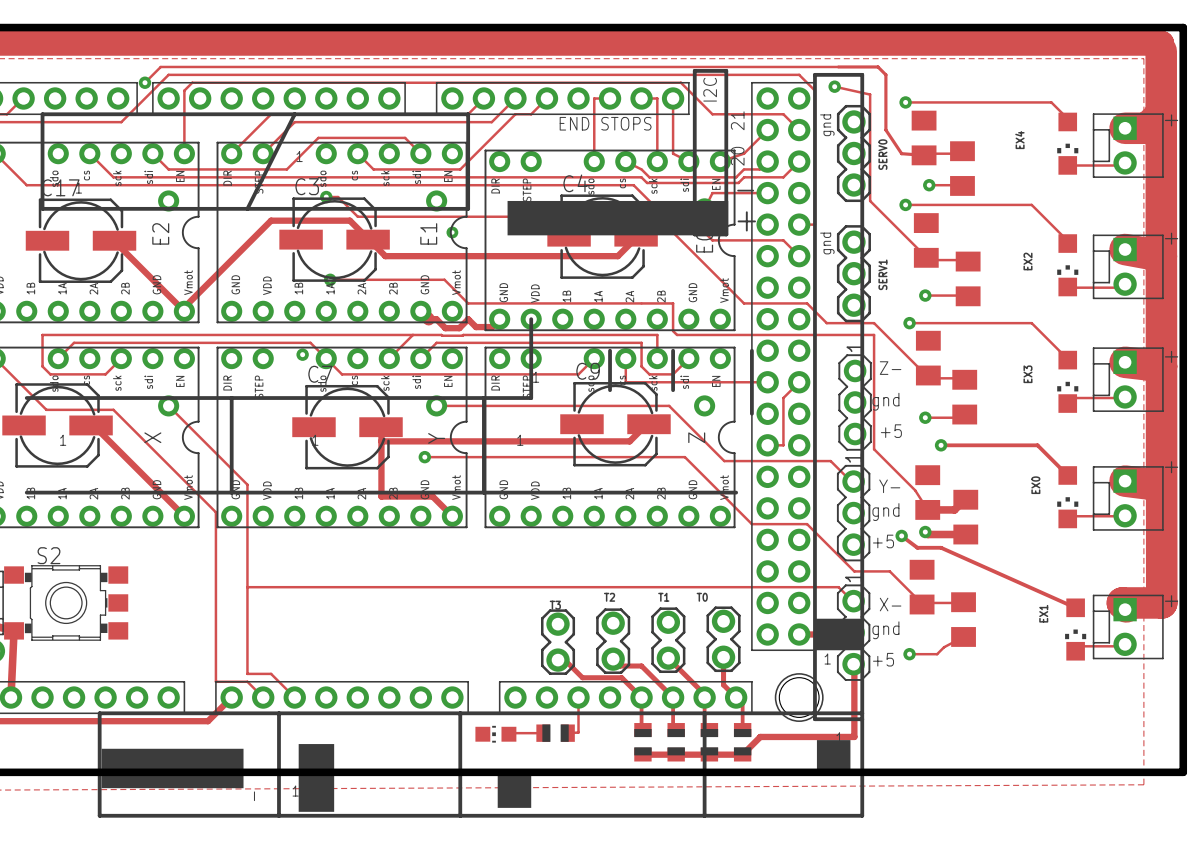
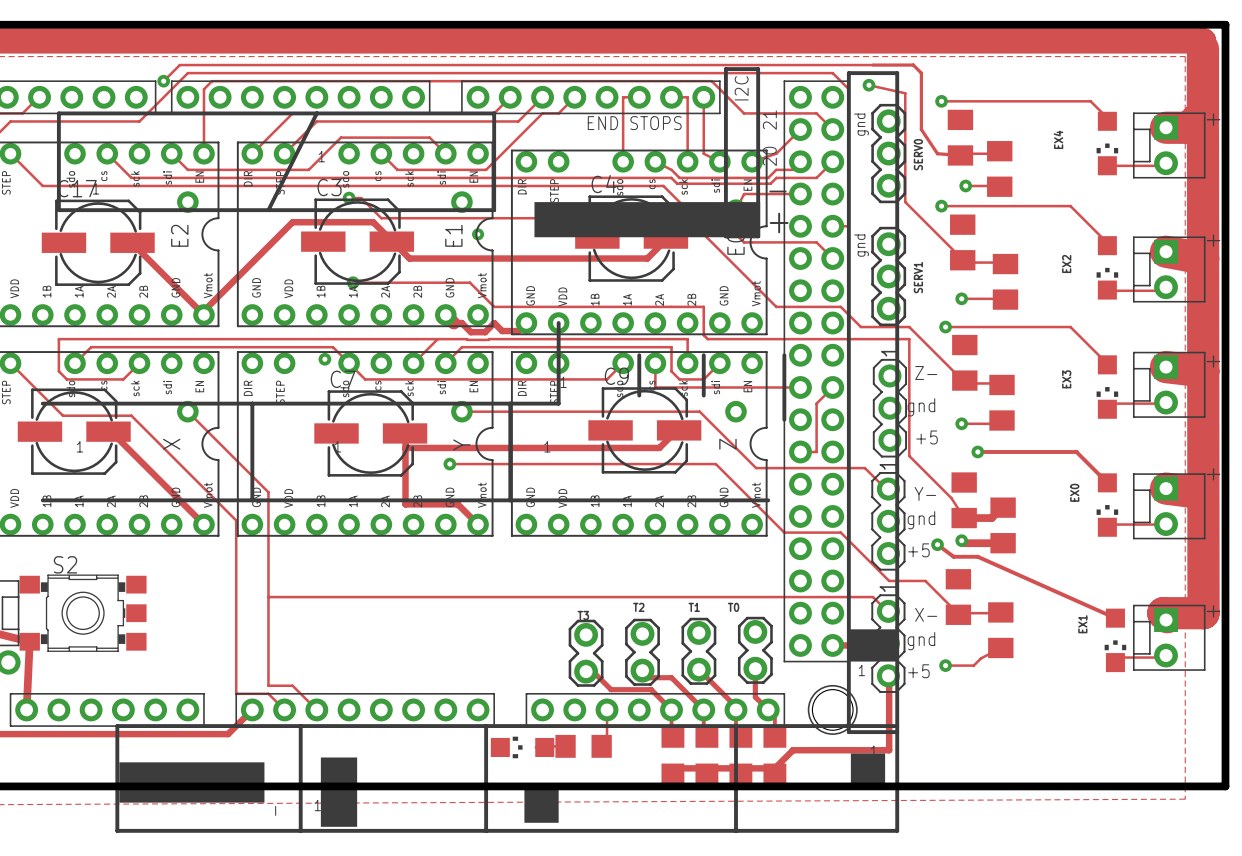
part footprint: [634, 723, 652, 762] -> [661, 727, 685, 784]
part footprint: [667, 723, 685, 762] -> [695, 727, 719, 784]
part footprint: [700, 723, 719, 762] -> [729, 727, 753, 784]
part footprint: [733, 723, 752, 762] -> [763, 727, 787, 784]
part footprint: [536, 724, 575, 742] -> [555, 734, 612, 758]
part footprint: [475, 725, 517, 743] -> [490, 736, 555, 759]

